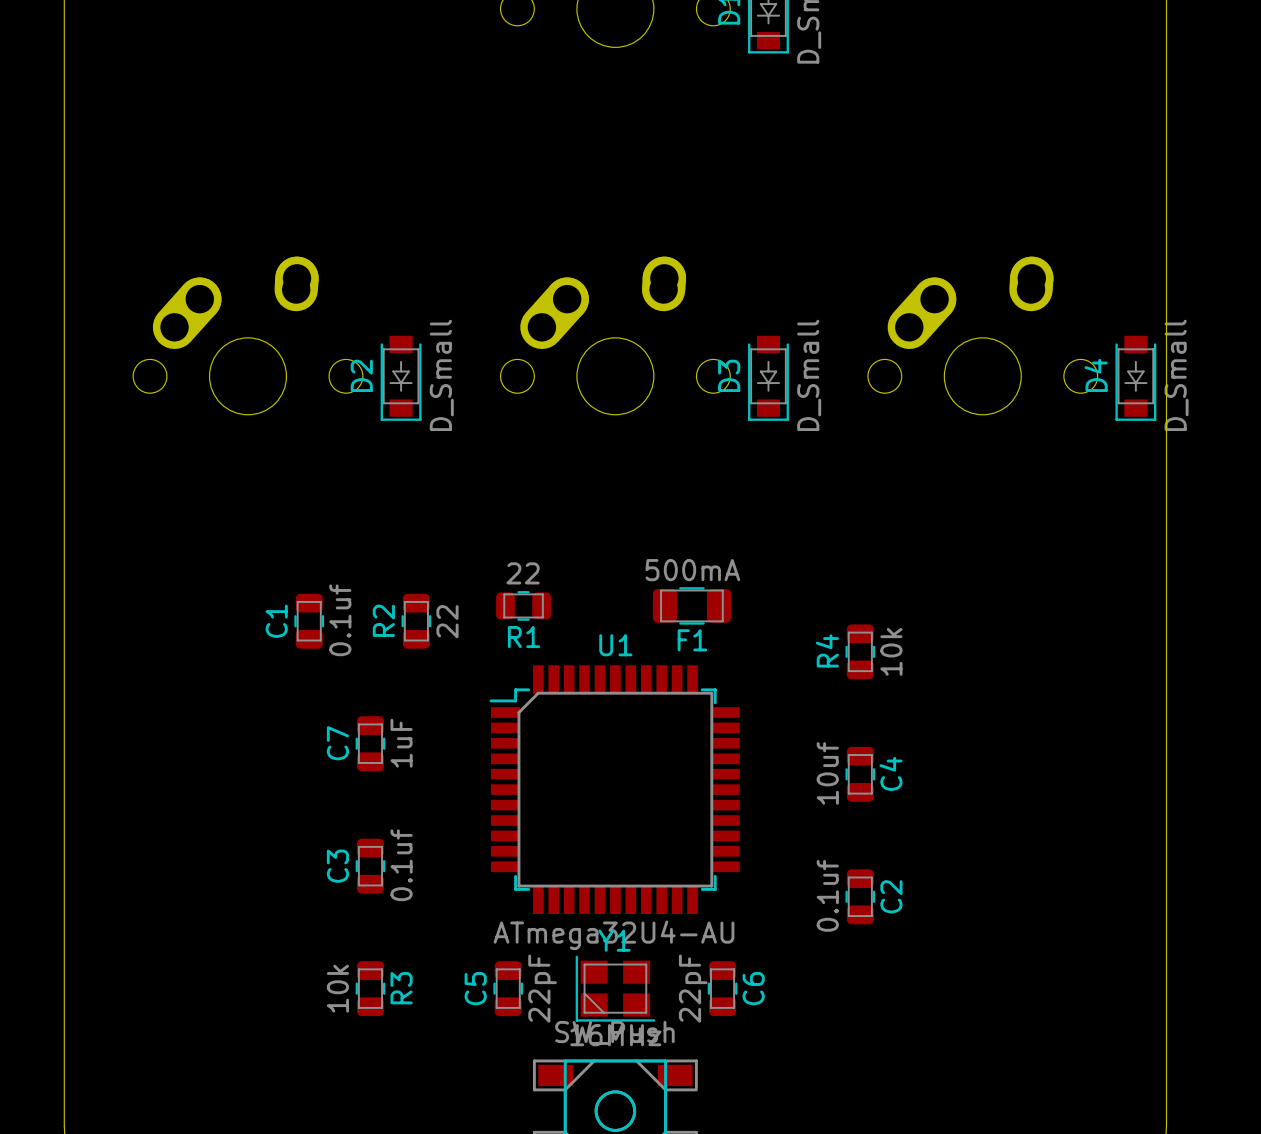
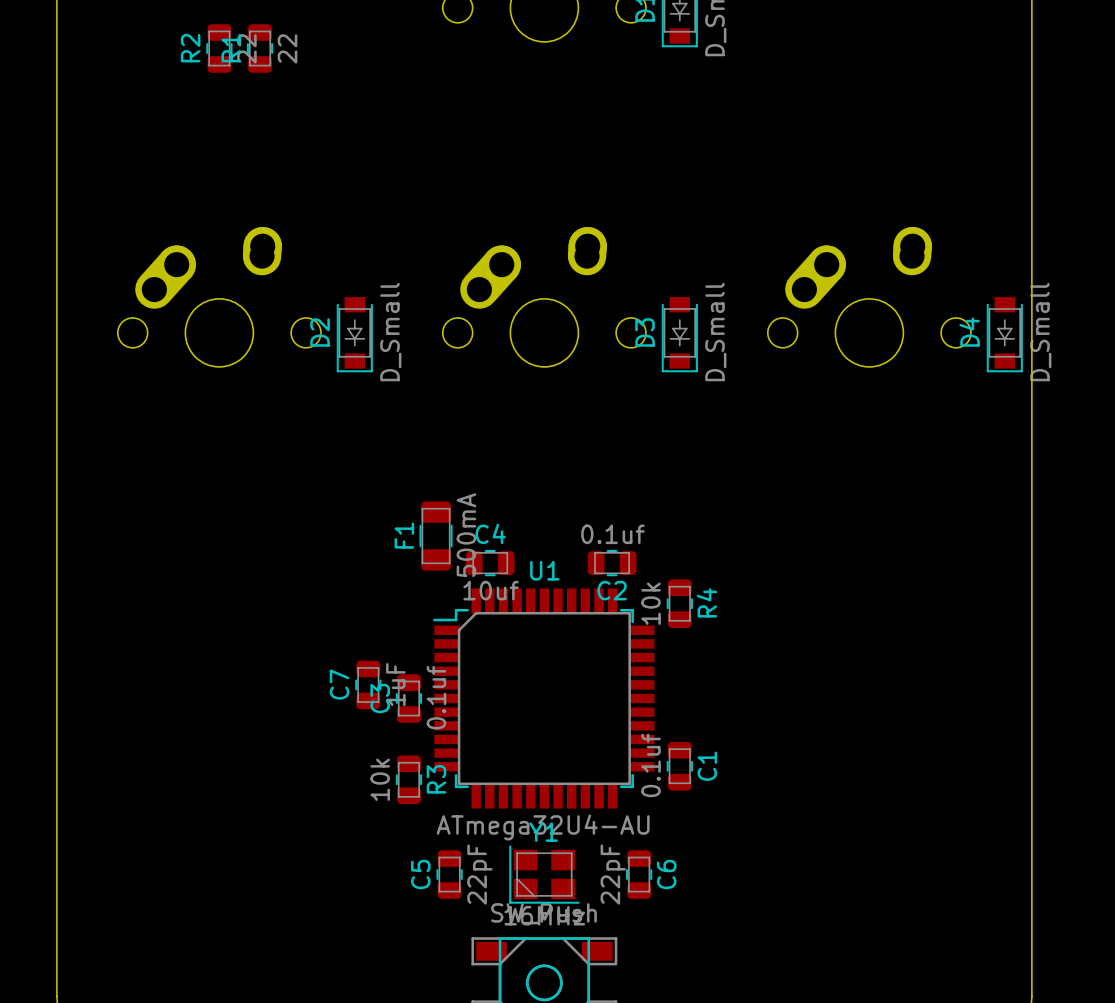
R1 rotation: 0° (523, 605) -> 90° clockwise (260, 48)
R1 position: (523, 605) -> (260, 48)
F1 rotation: 0° (691, 605) -> 90° clockwise (436, 536)
F1 position: (691, 605) -> (436, 536)
C1 value position: 0.1uf (340, 620) -> 0.1uf (651, 765)
C1 name position: C1 (276, 621) -> C1 (707, 766)
C1 position: (309, 621) -> (679, 766)
R2 position: (416, 621) -> (219, 48)
R4 name position: R4 (827, 650) -> R4 (706, 602)
R4 position: (860, 651) -> (679, 603)
R4 value position: 10k (891, 651) -> 10k (651, 603)
C7 position: (370, 743) -> (368, 684)
C4 value position: 10uf (827, 773) -> 10uf (491, 590)
C4 name position: C4 (890, 773) -> C4 (490, 533)
C4 rotation: 0° (860, 774) -> 90° clockwise (490, 563)
C4 position: (860, 774) -> (490, 563)
C3 position: (370, 866) -> (408, 698)
C2 rotation: 0° (860, 896) -> 90° clockwise (612, 563)
C2 position: (860, 896) -> (612, 563)
R3 position: (370, 988) -> (408, 779)

